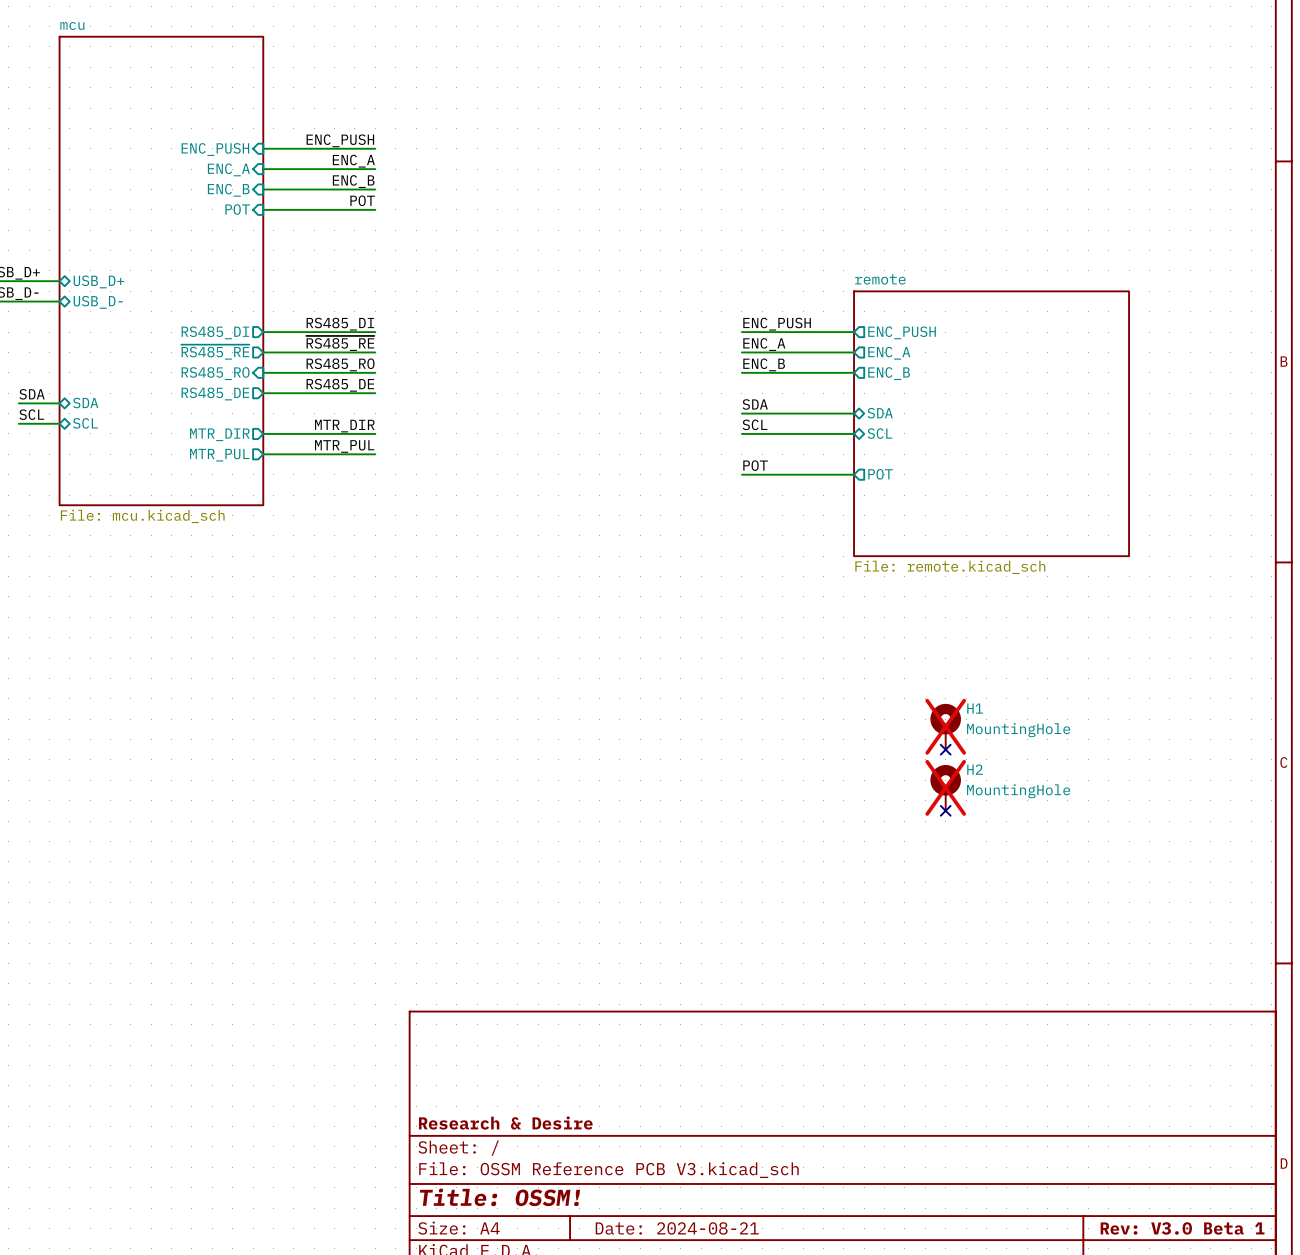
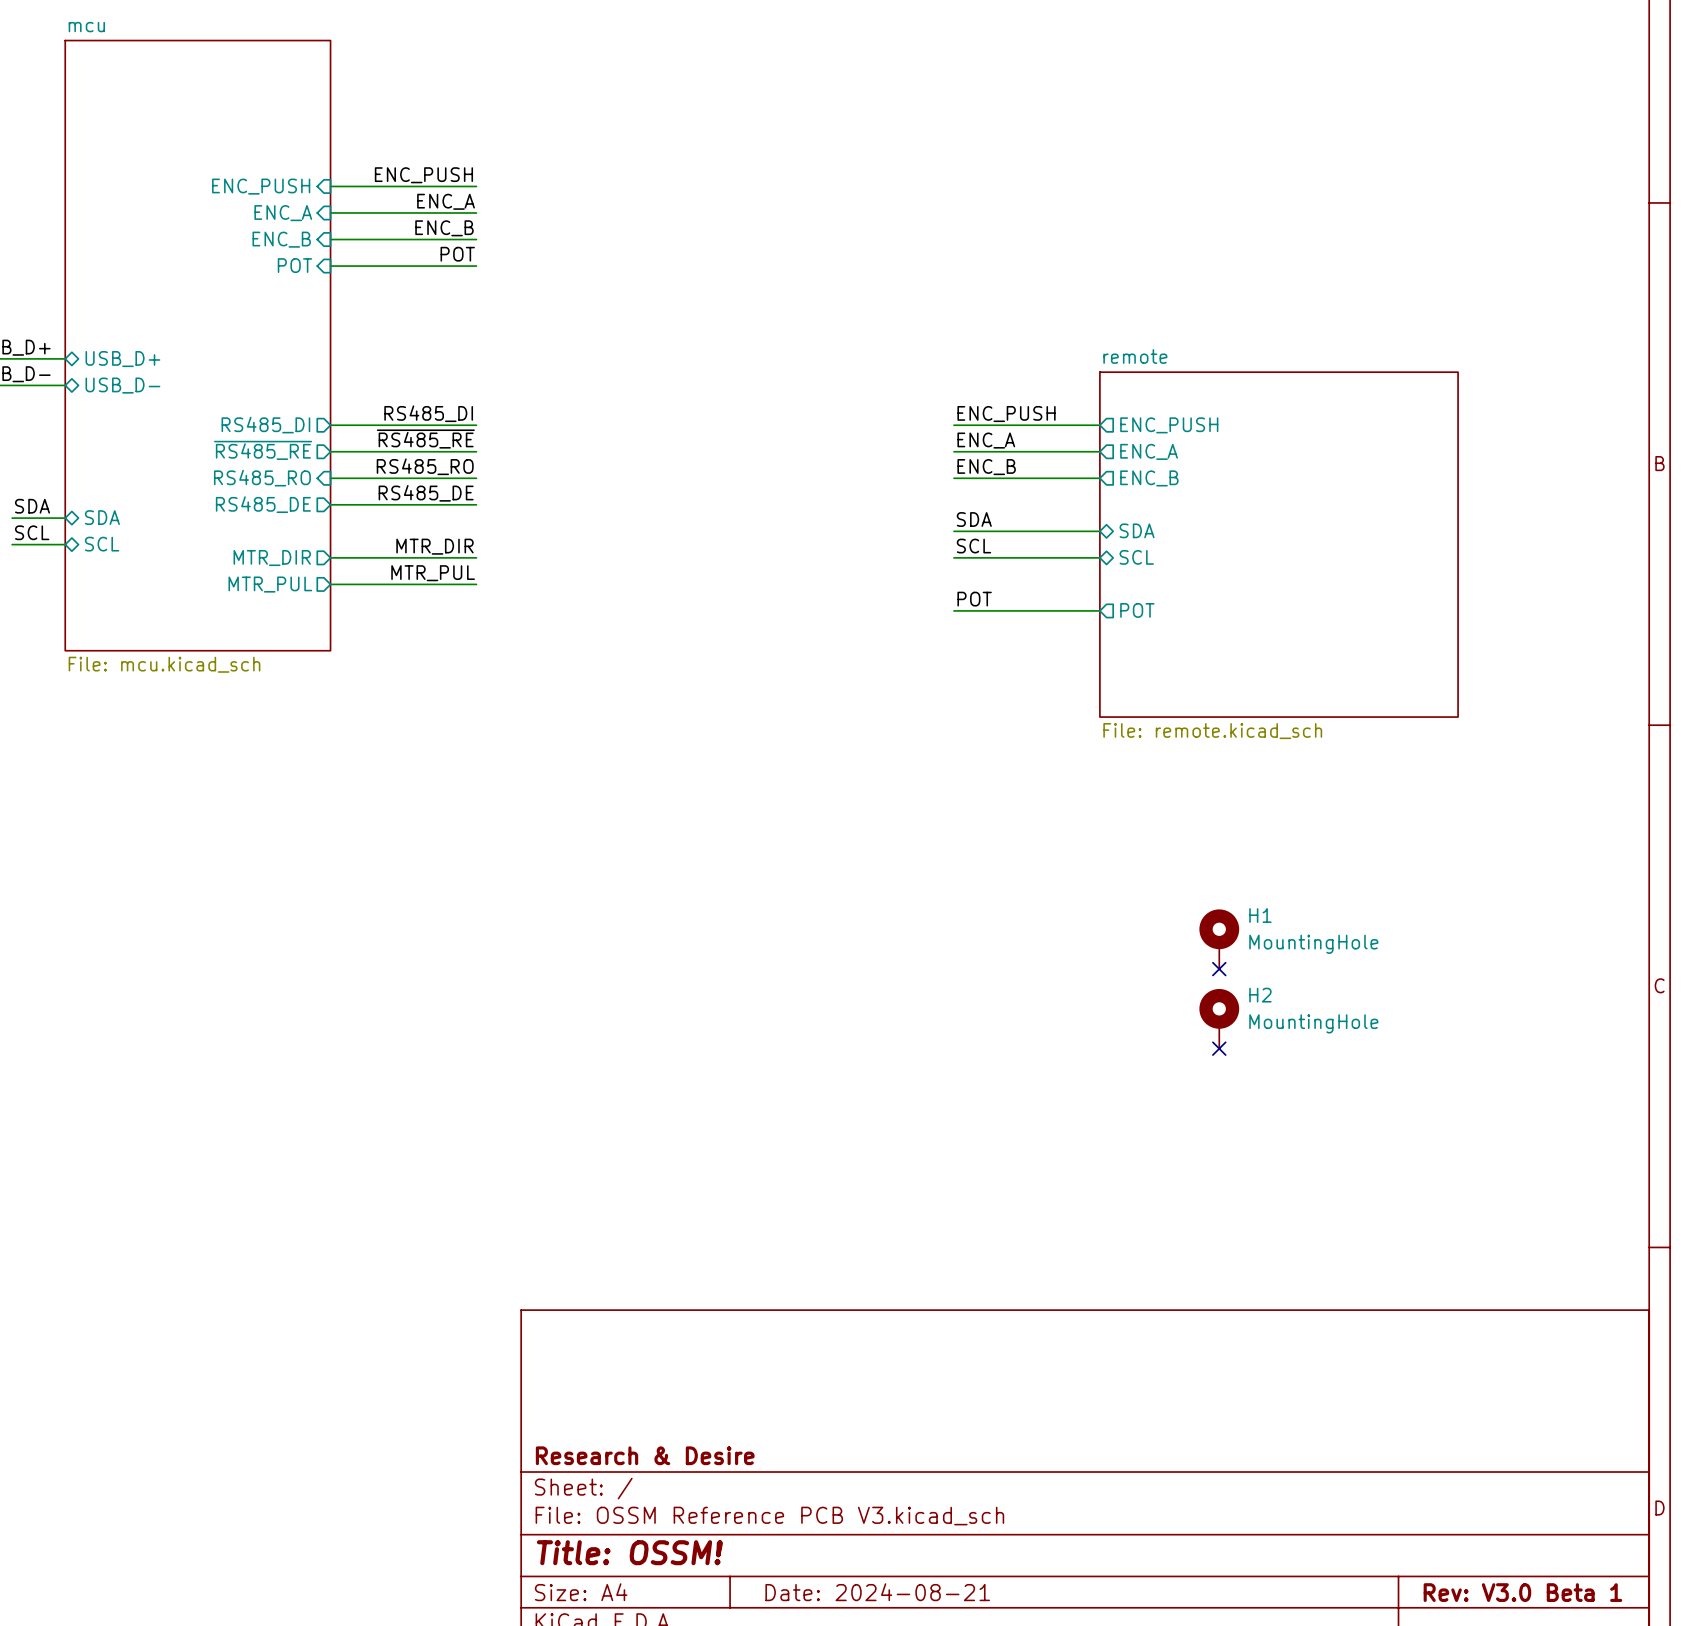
H1 do-not-place cross: (945, 726) -> none
H2 do-not-place cross: (945, 787) -> none

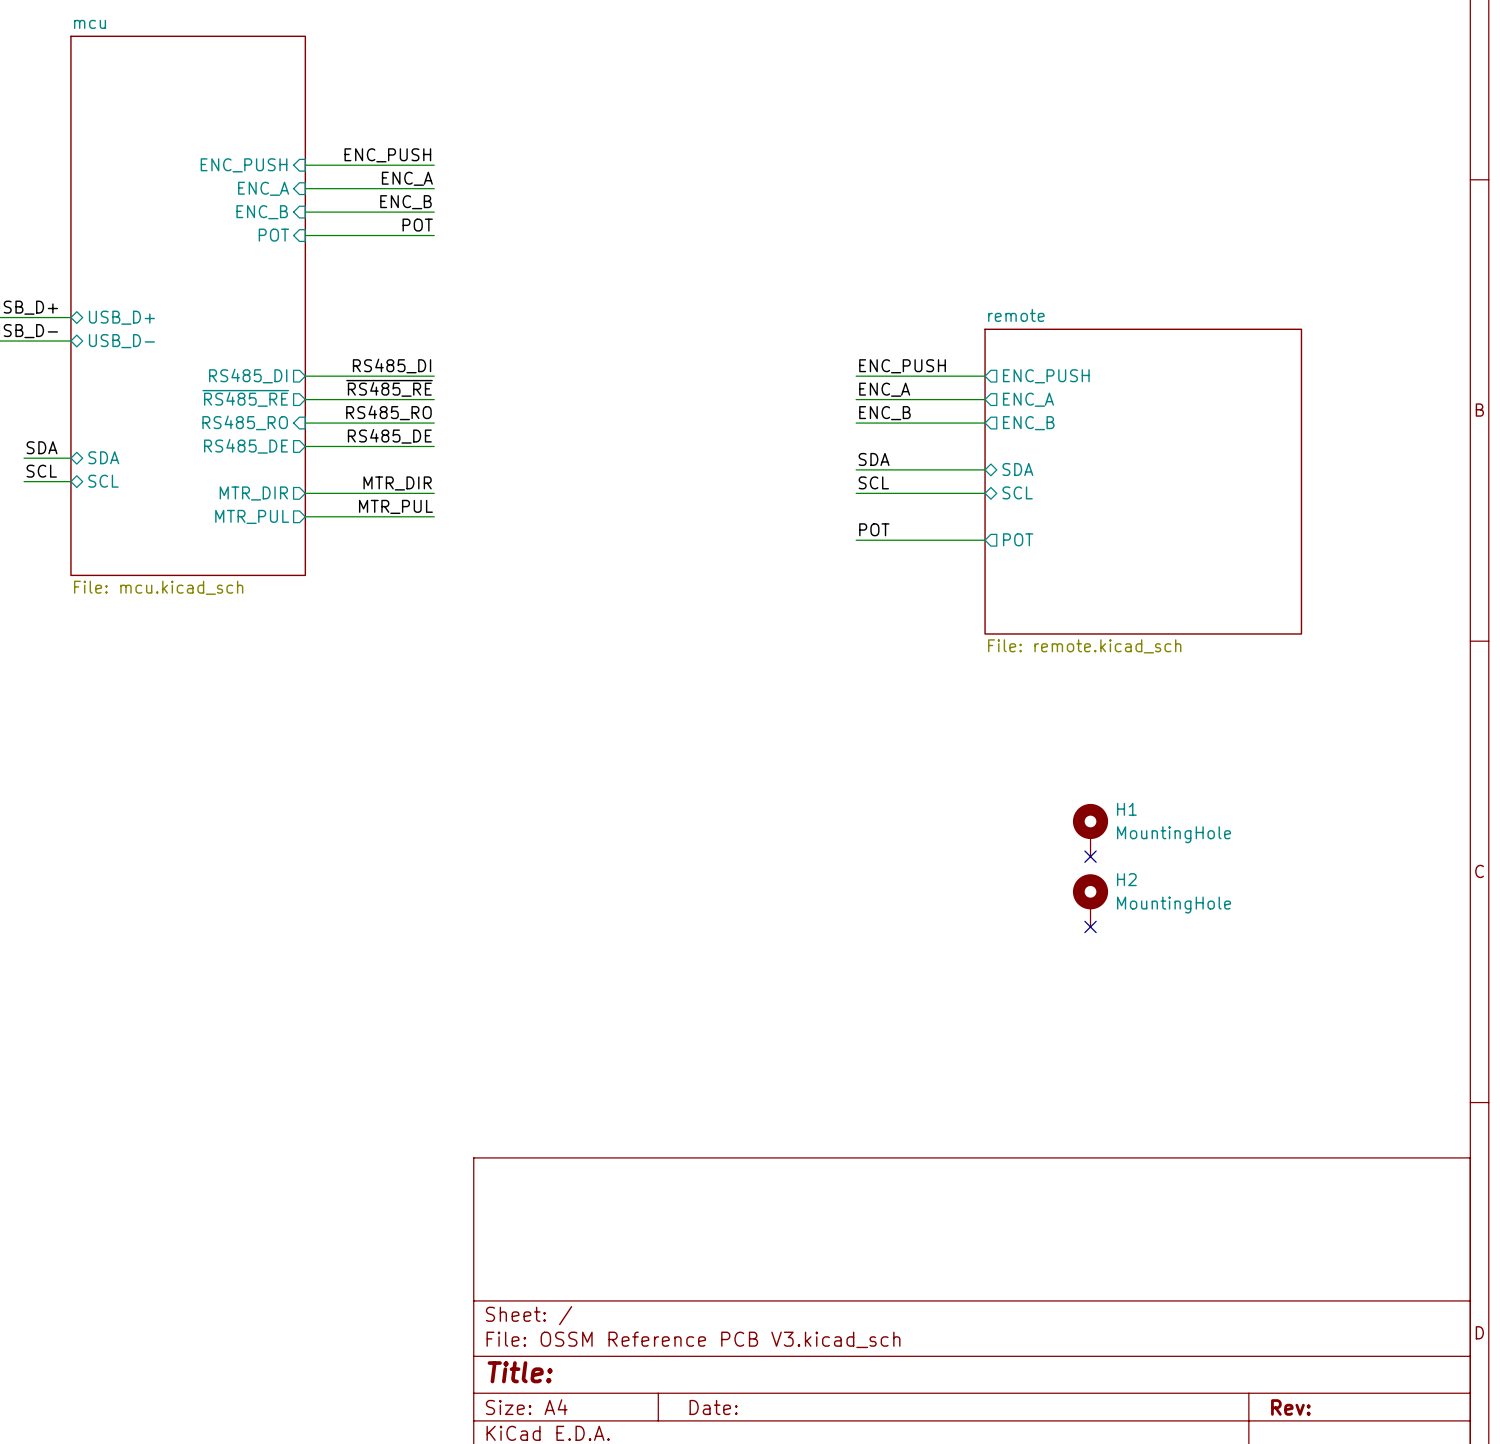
title block: Research & Desire (645, 1455) -> none
title block: Title: OSSM! (629, 1552) -> Title: (520, 1372)
title block: Date: 2024-08-21 (877, 1592) -> Date: (713, 1407)
title block: Rev: V3.0 Beta 1 (1522, 1592) -> Rev: (1290, 1407)

